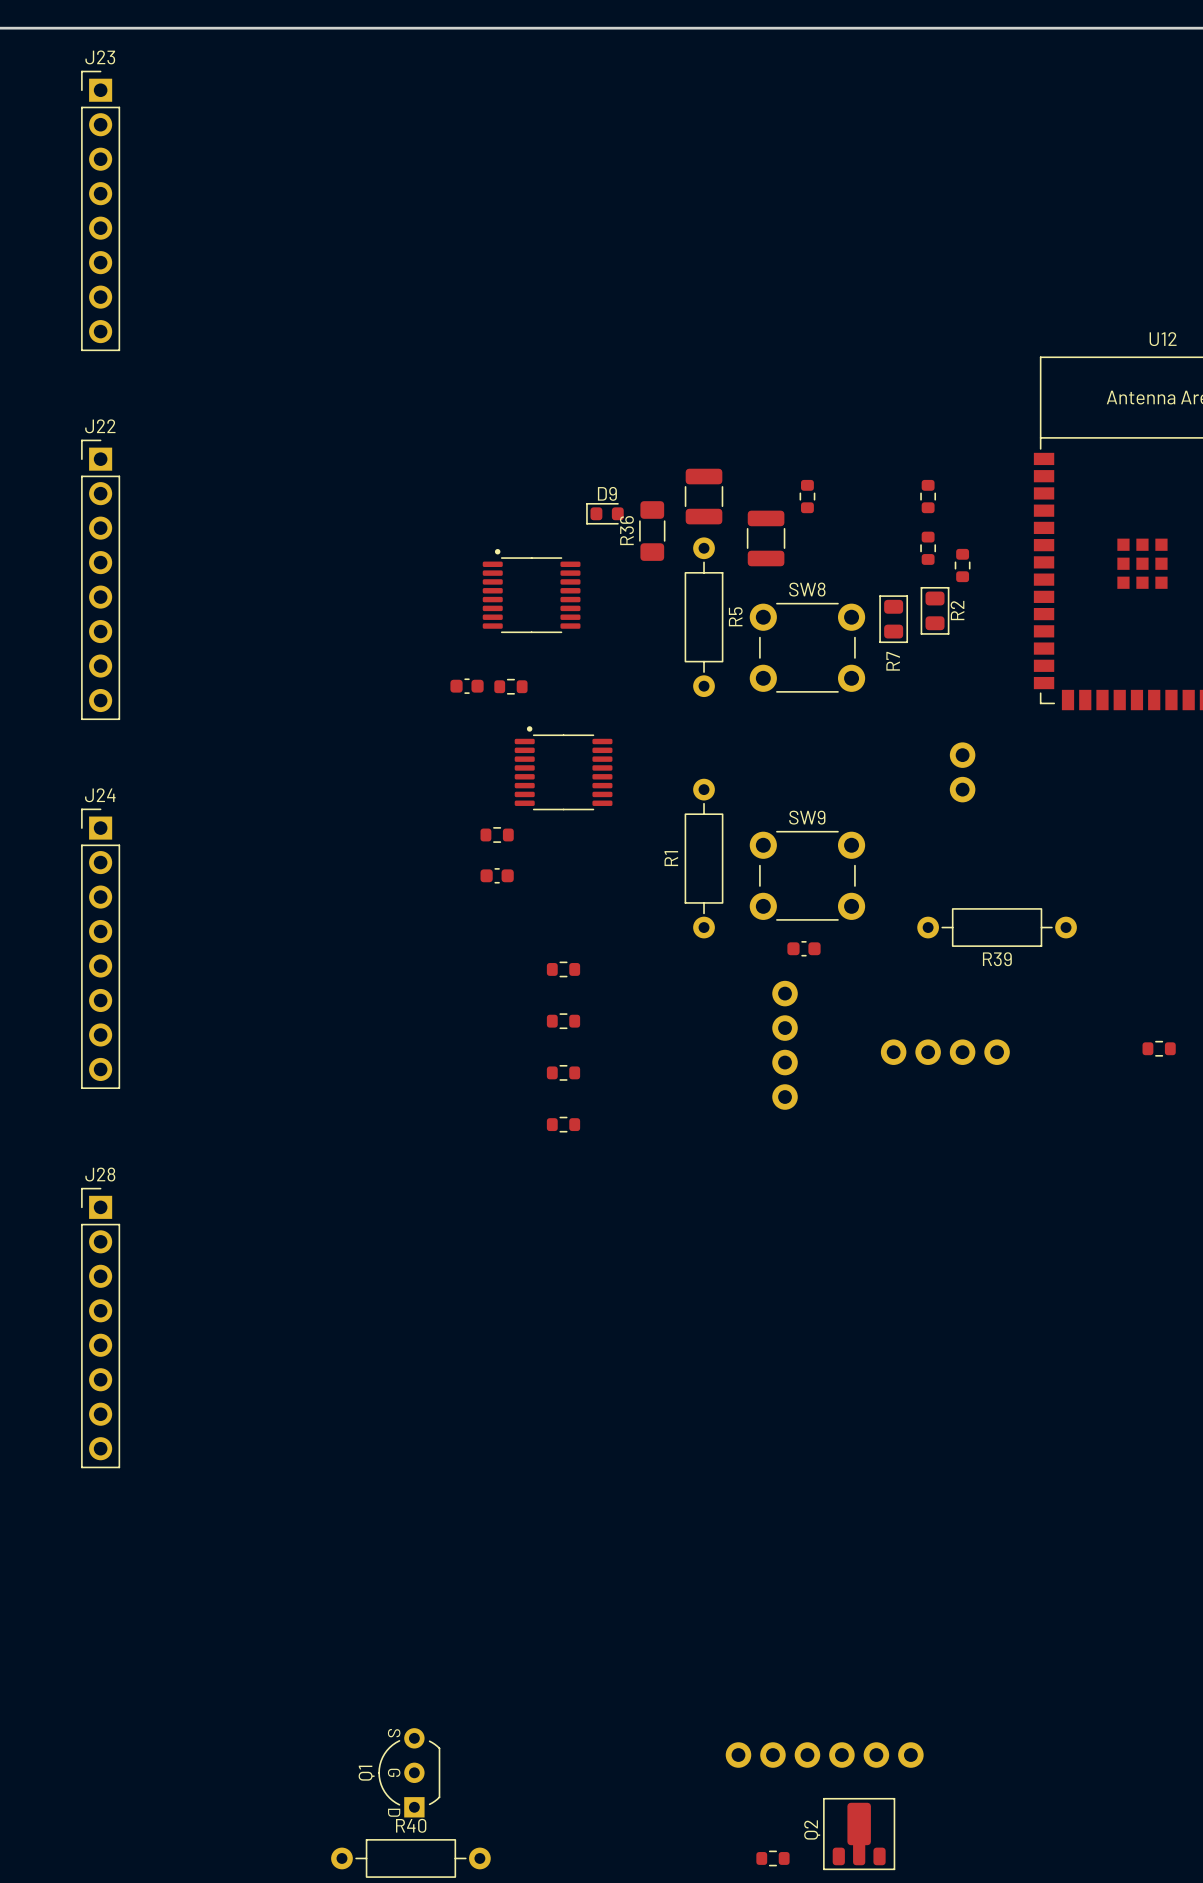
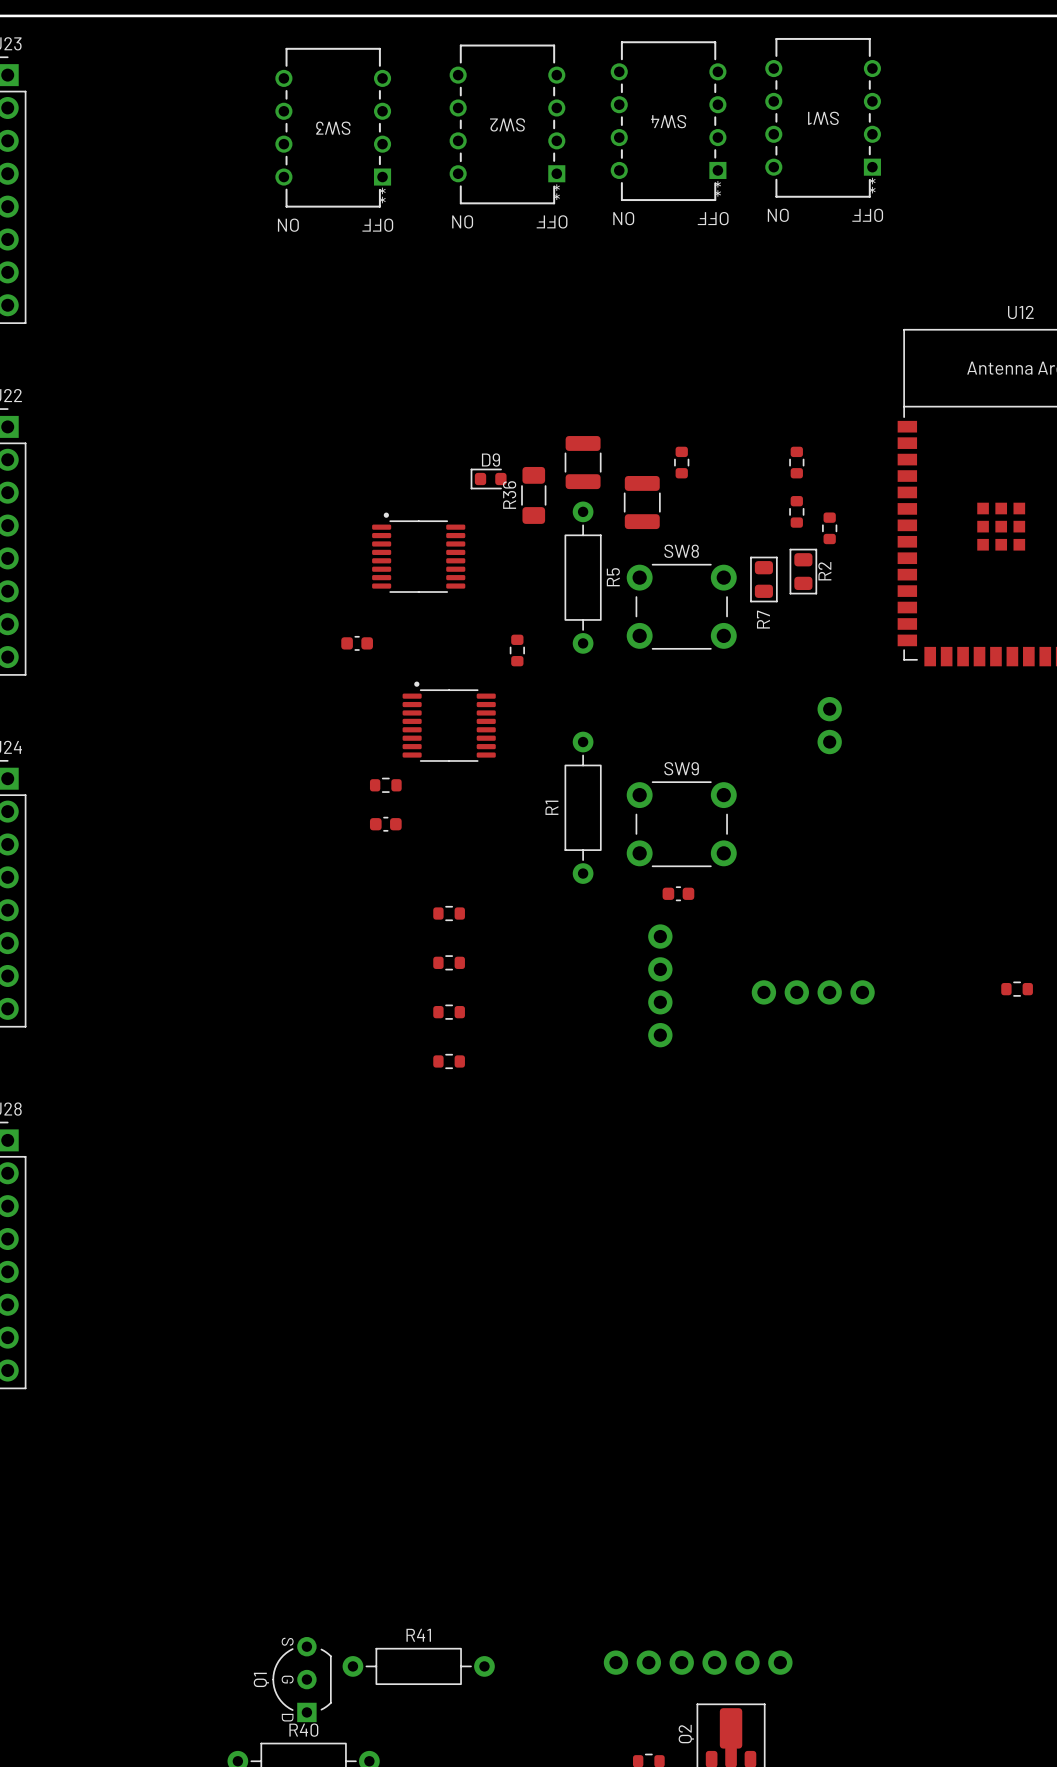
SW1: none -> (823, 117)
SW4: none -> (668, 121)
SW2: none -> (507, 124)
SW3: none -> (333, 127)
part rotation: 0° (510, 686) -> 90° clockwise (517, 650)
part position: (510, 686) -> (517, 650)
R39: (997, 927) -> none
R41: none -> (418, 1666)

